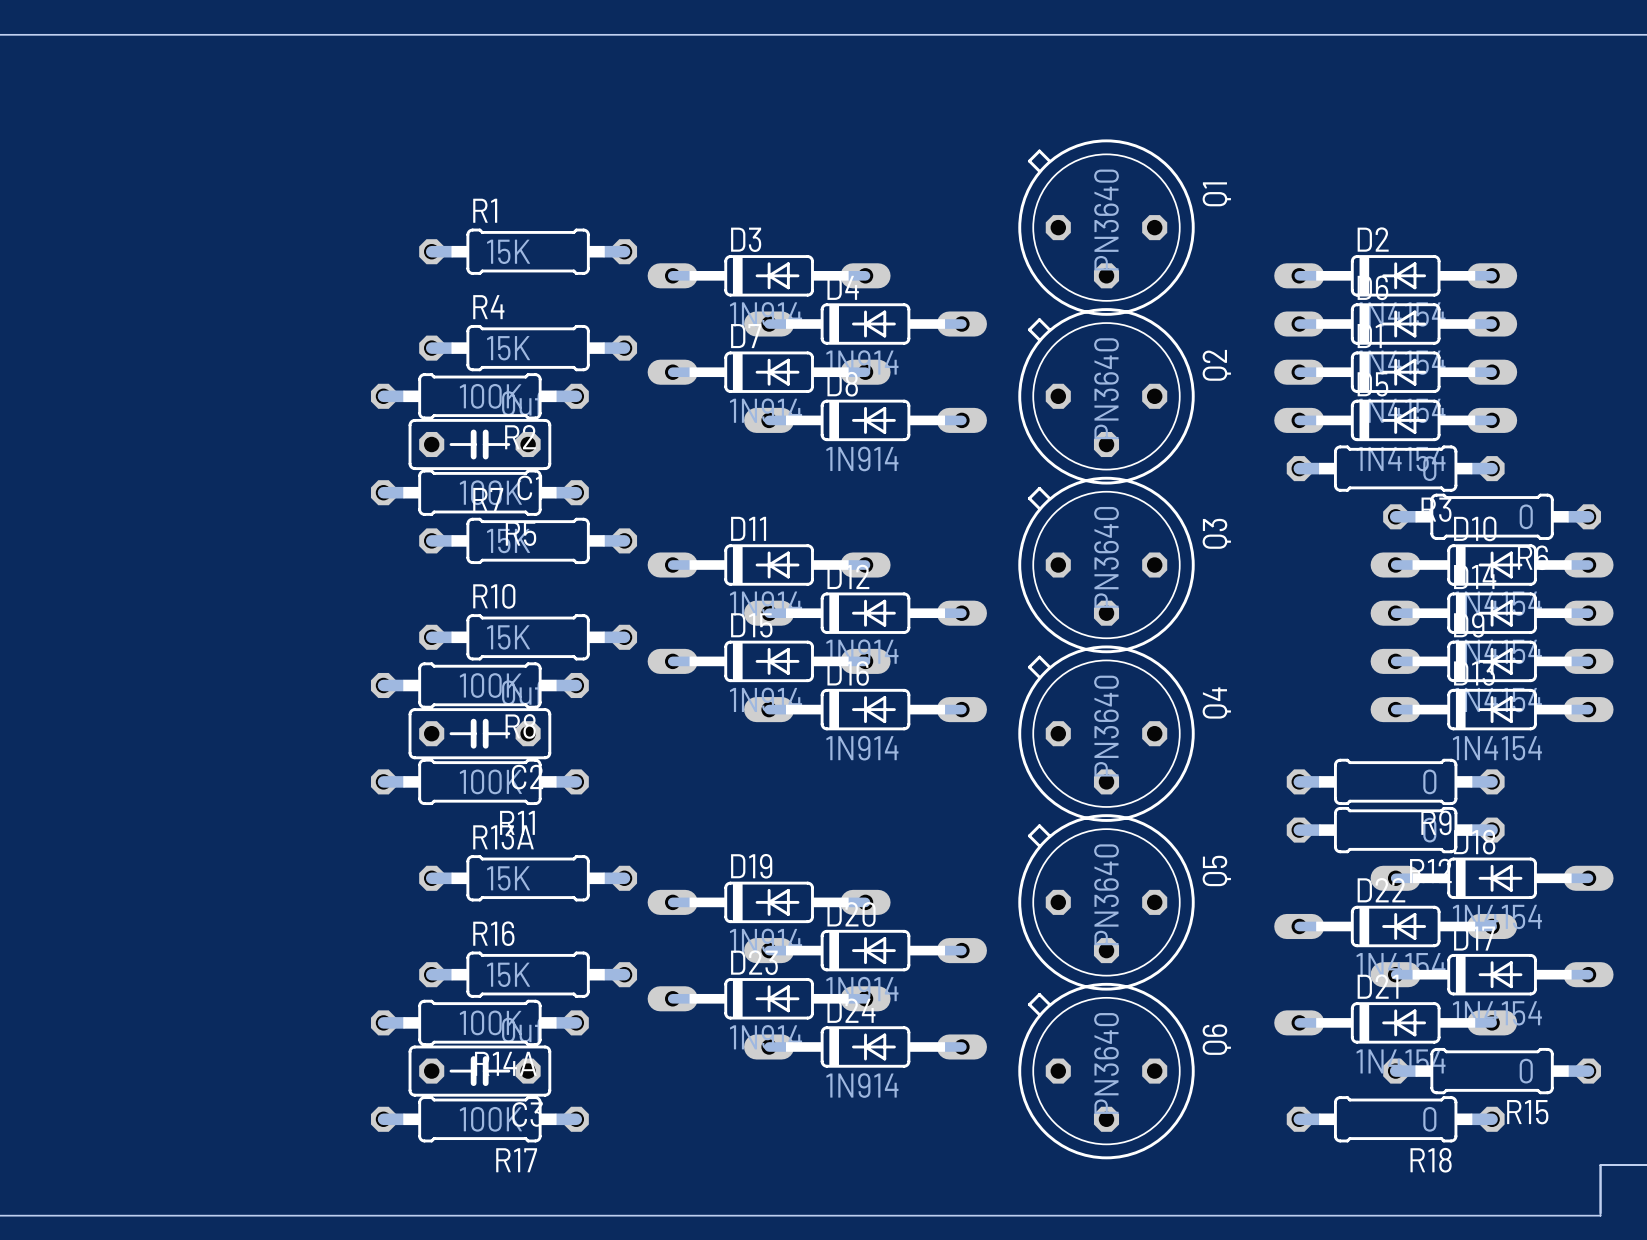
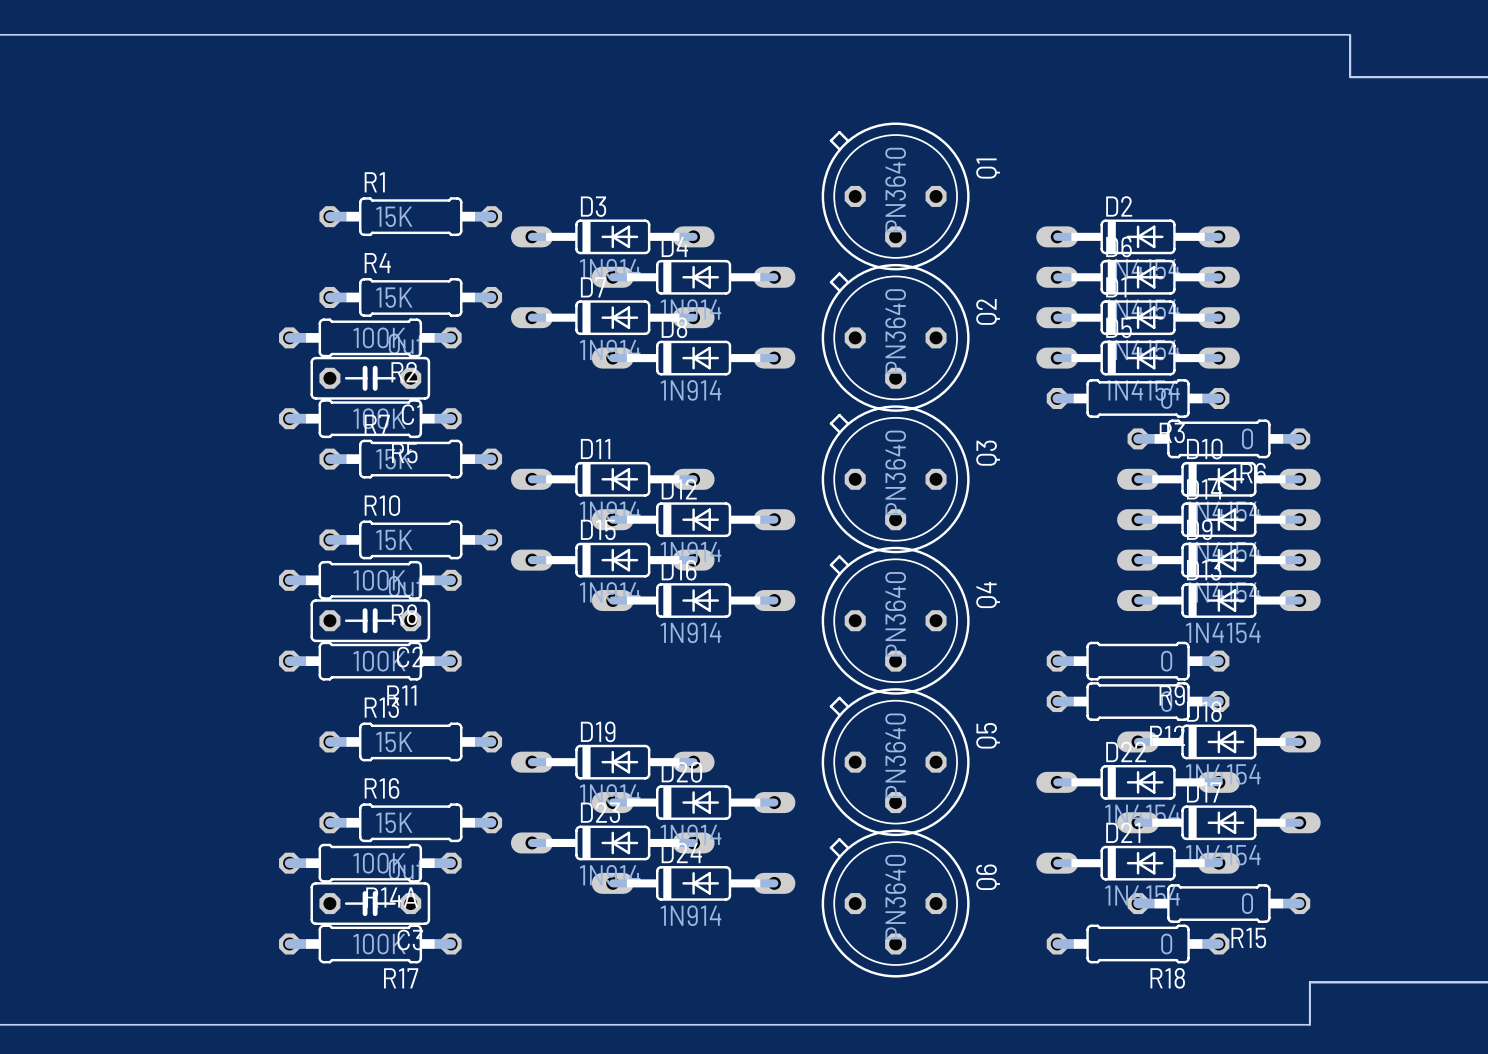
R13A name: R13A (503, 837) -> R13 (381, 707)

